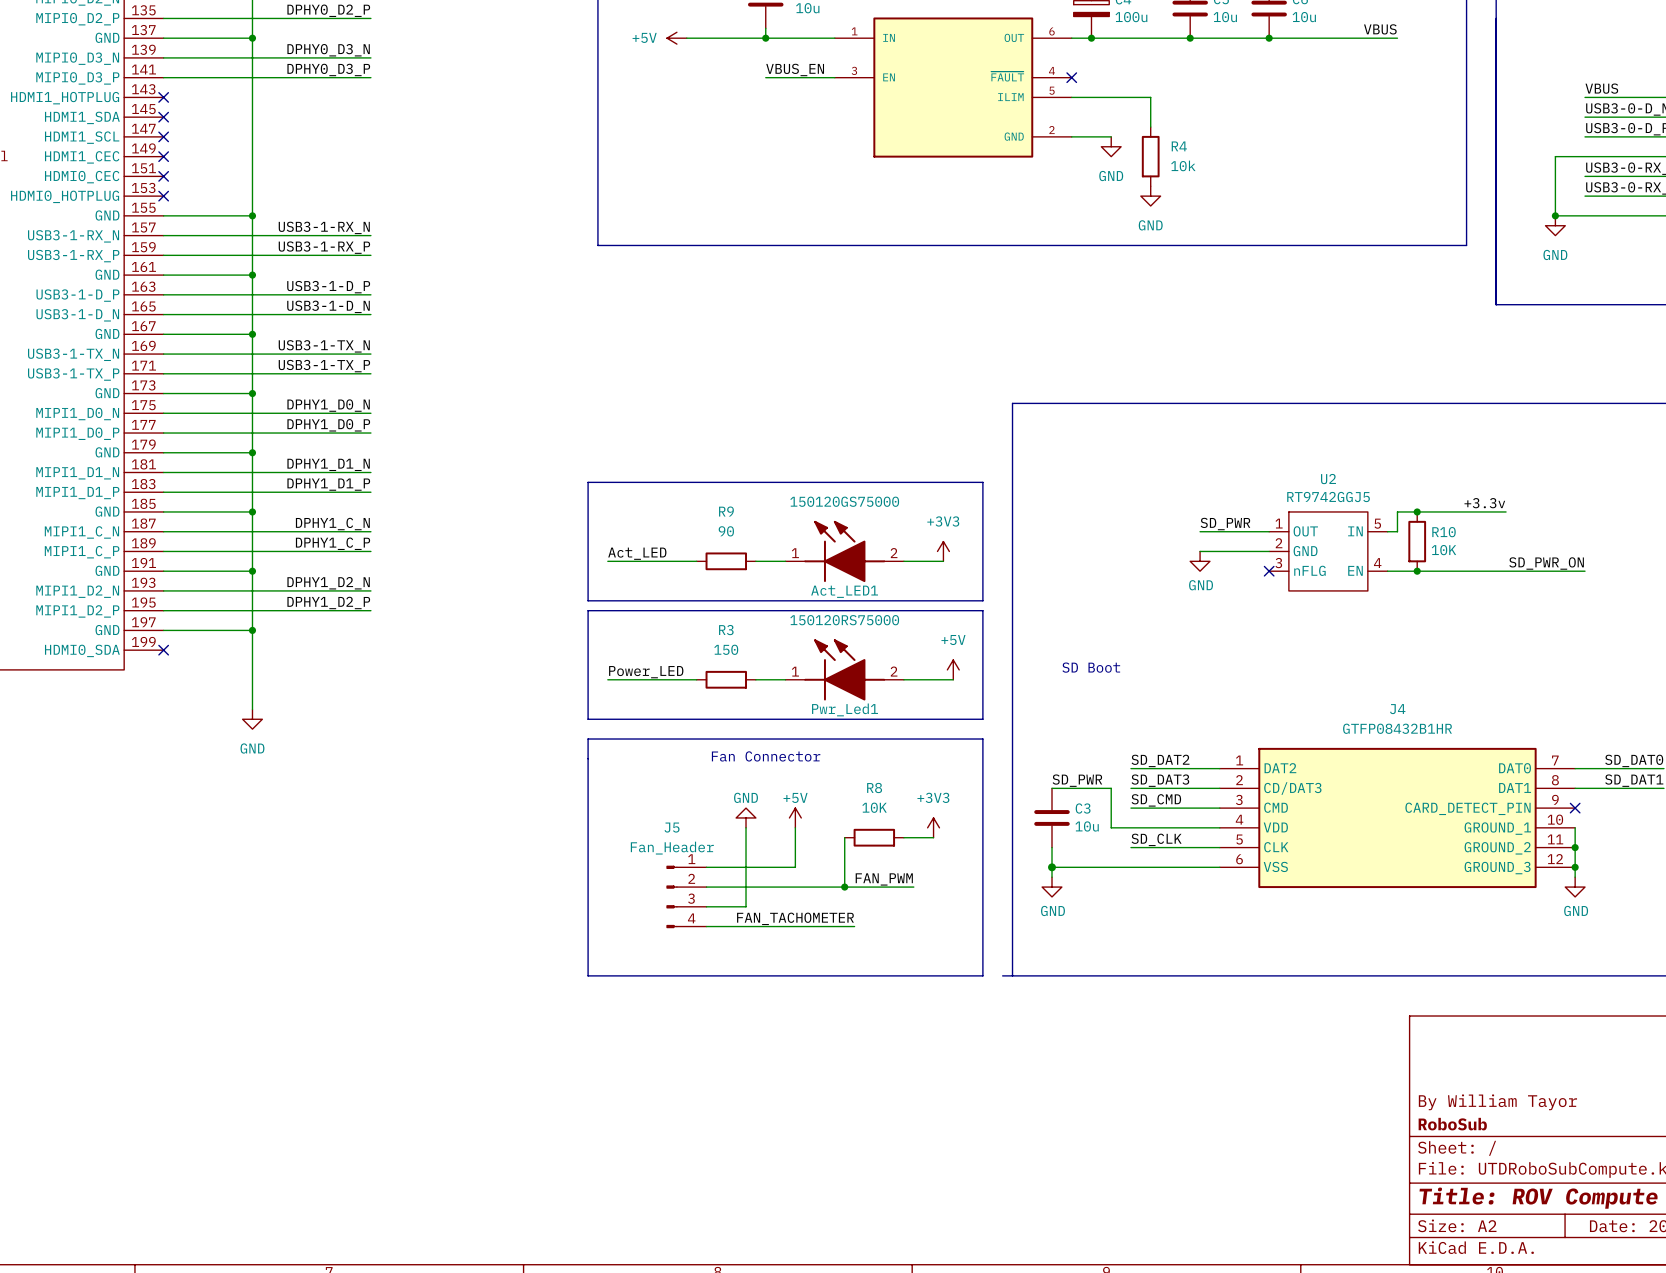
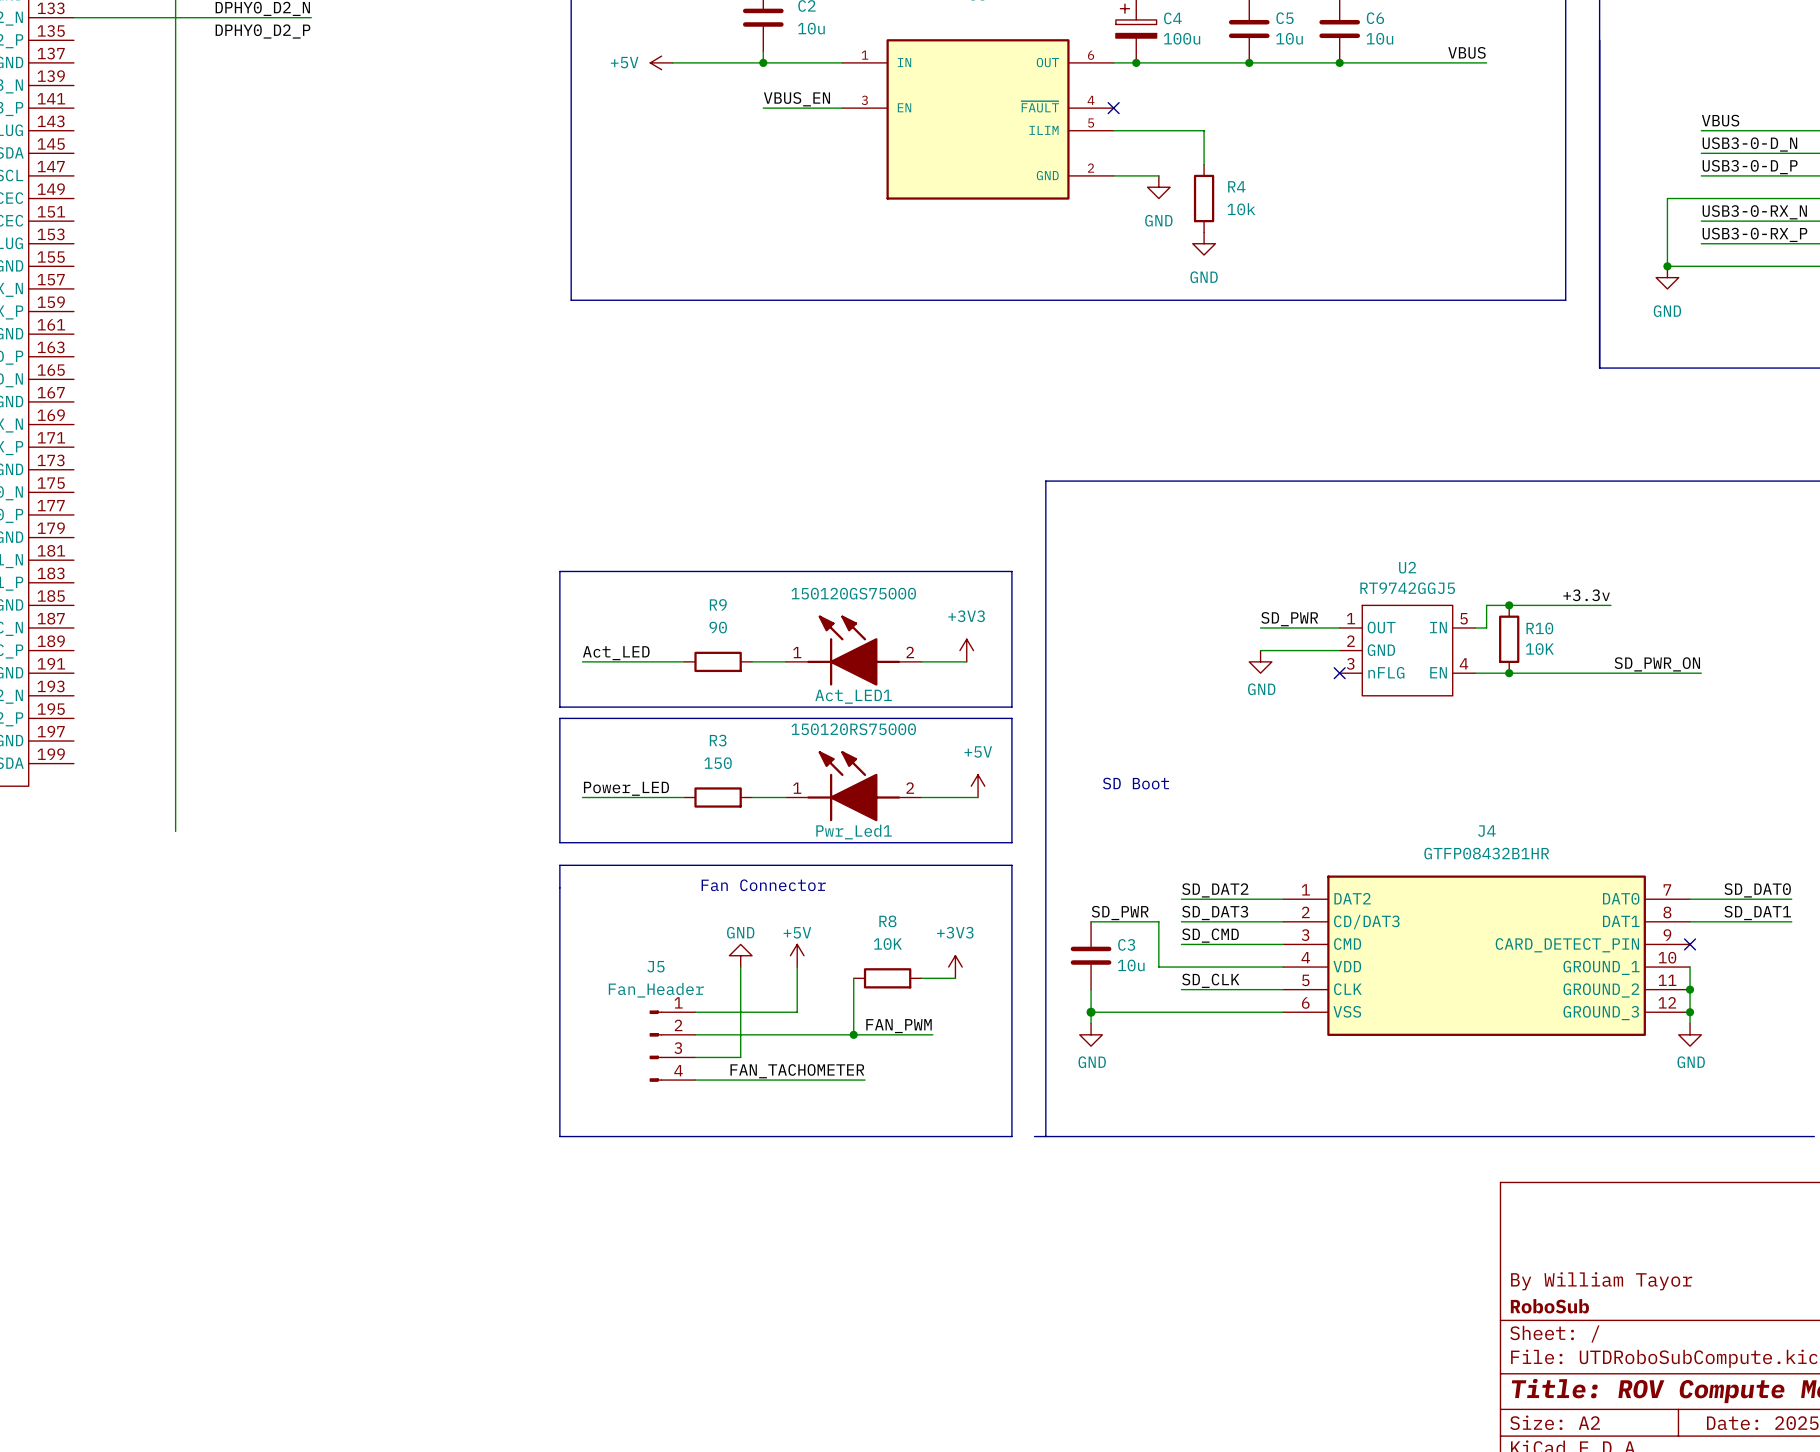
wire: (163, 18) (370, 18) -> none
wire: (163, 38) (252, 38) -> none
junction: (252, 38) -> none
label: DPHY0_D3_N (328, 50) -> none
wire: (163, 57) (370, 57) -> none
label: DPHY0_D3_P (328, 69) -> none
wire: (163, 77) (370, 77) -> none
no-connect mark: (163, 97) -> none
no-connect mark: (163, 117) -> none
no-connect mark: (163, 136) -> none
no-connect mark: (163, 156) -> none
no-connect mark: (163, 176) -> none
no-connect mark: (163, 196) -> none
wire: (163, 215) (252, 215) -> none
junction: (252, 215) -> none
label: USB3-1-RX_N (324, 227) -> none
wire: (163, 235) (370, 235) -> none
label: USB3-1-RX_P (324, 247) -> none
wire: (163, 255) (370, 255) -> none
wire: (163, 275) (252, 275) -> none
junction: (252, 275) -> none
label: USB3-1-D_P (328, 287) -> none
wire: (163, 294) (370, 294) -> none
label: USB3-1-D_N (328, 306) -> none
wire: (163, 314) (370, 314) -> none
wire: (163, 334) (252, 334) -> none
junction: (252, 334) -> none
label: USB3-1-TX_N (324, 346) -> none
wire: (163, 354) (370, 354) -> none
label: USB3-1-TX_P (324, 366) -> none
wire: (163, 373) (370, 373) -> none
wire: (163, 393) (252, 393) -> none
junction: (252, 393) -> none
label: DPHY1_D0_N (328, 405) -> none
wire: (163, 413) (370, 413) -> none
label: DPHY1_D0_P (328, 425) -> none
wire: (163, 433) (370, 433) -> none
wire: (163, 452) (252, 452) -> none
junction: (252, 452) -> none
label: DPHY1_D1_N (328, 464) -> none
wire: (163, 472) (370, 472) -> none
label: DPHY1_D1_P (328, 484) -> none
wire: (163, 492) (370, 492) -> none
wire: (163, 511) (252, 511) -> none
junction: (252, 511) -> none
label: DPHY1_C_N (332, 524) -> none
wire: (163, 531) (370, 531) -> none
label: DPHY1_C_P (333, 543) -> none
wire: (163, 551) (370, 551) -> none
wire: (163, 571) (252, 571) -> none
junction: (252, 571) -> none
label: DPHY1_D2_N (328, 583) -> none
wire: (163, 590) (370, 590) -> none
label: DPHY1_D2_P (328, 602) -> none
wire: (163, 610) (370, 610) -> none
wire: (163, 630) (252, 630) -> none
junction: (252, 630) -> none
no-connect mark: (163, 650) -> none
power symbol: GND (252, 719) -> none

